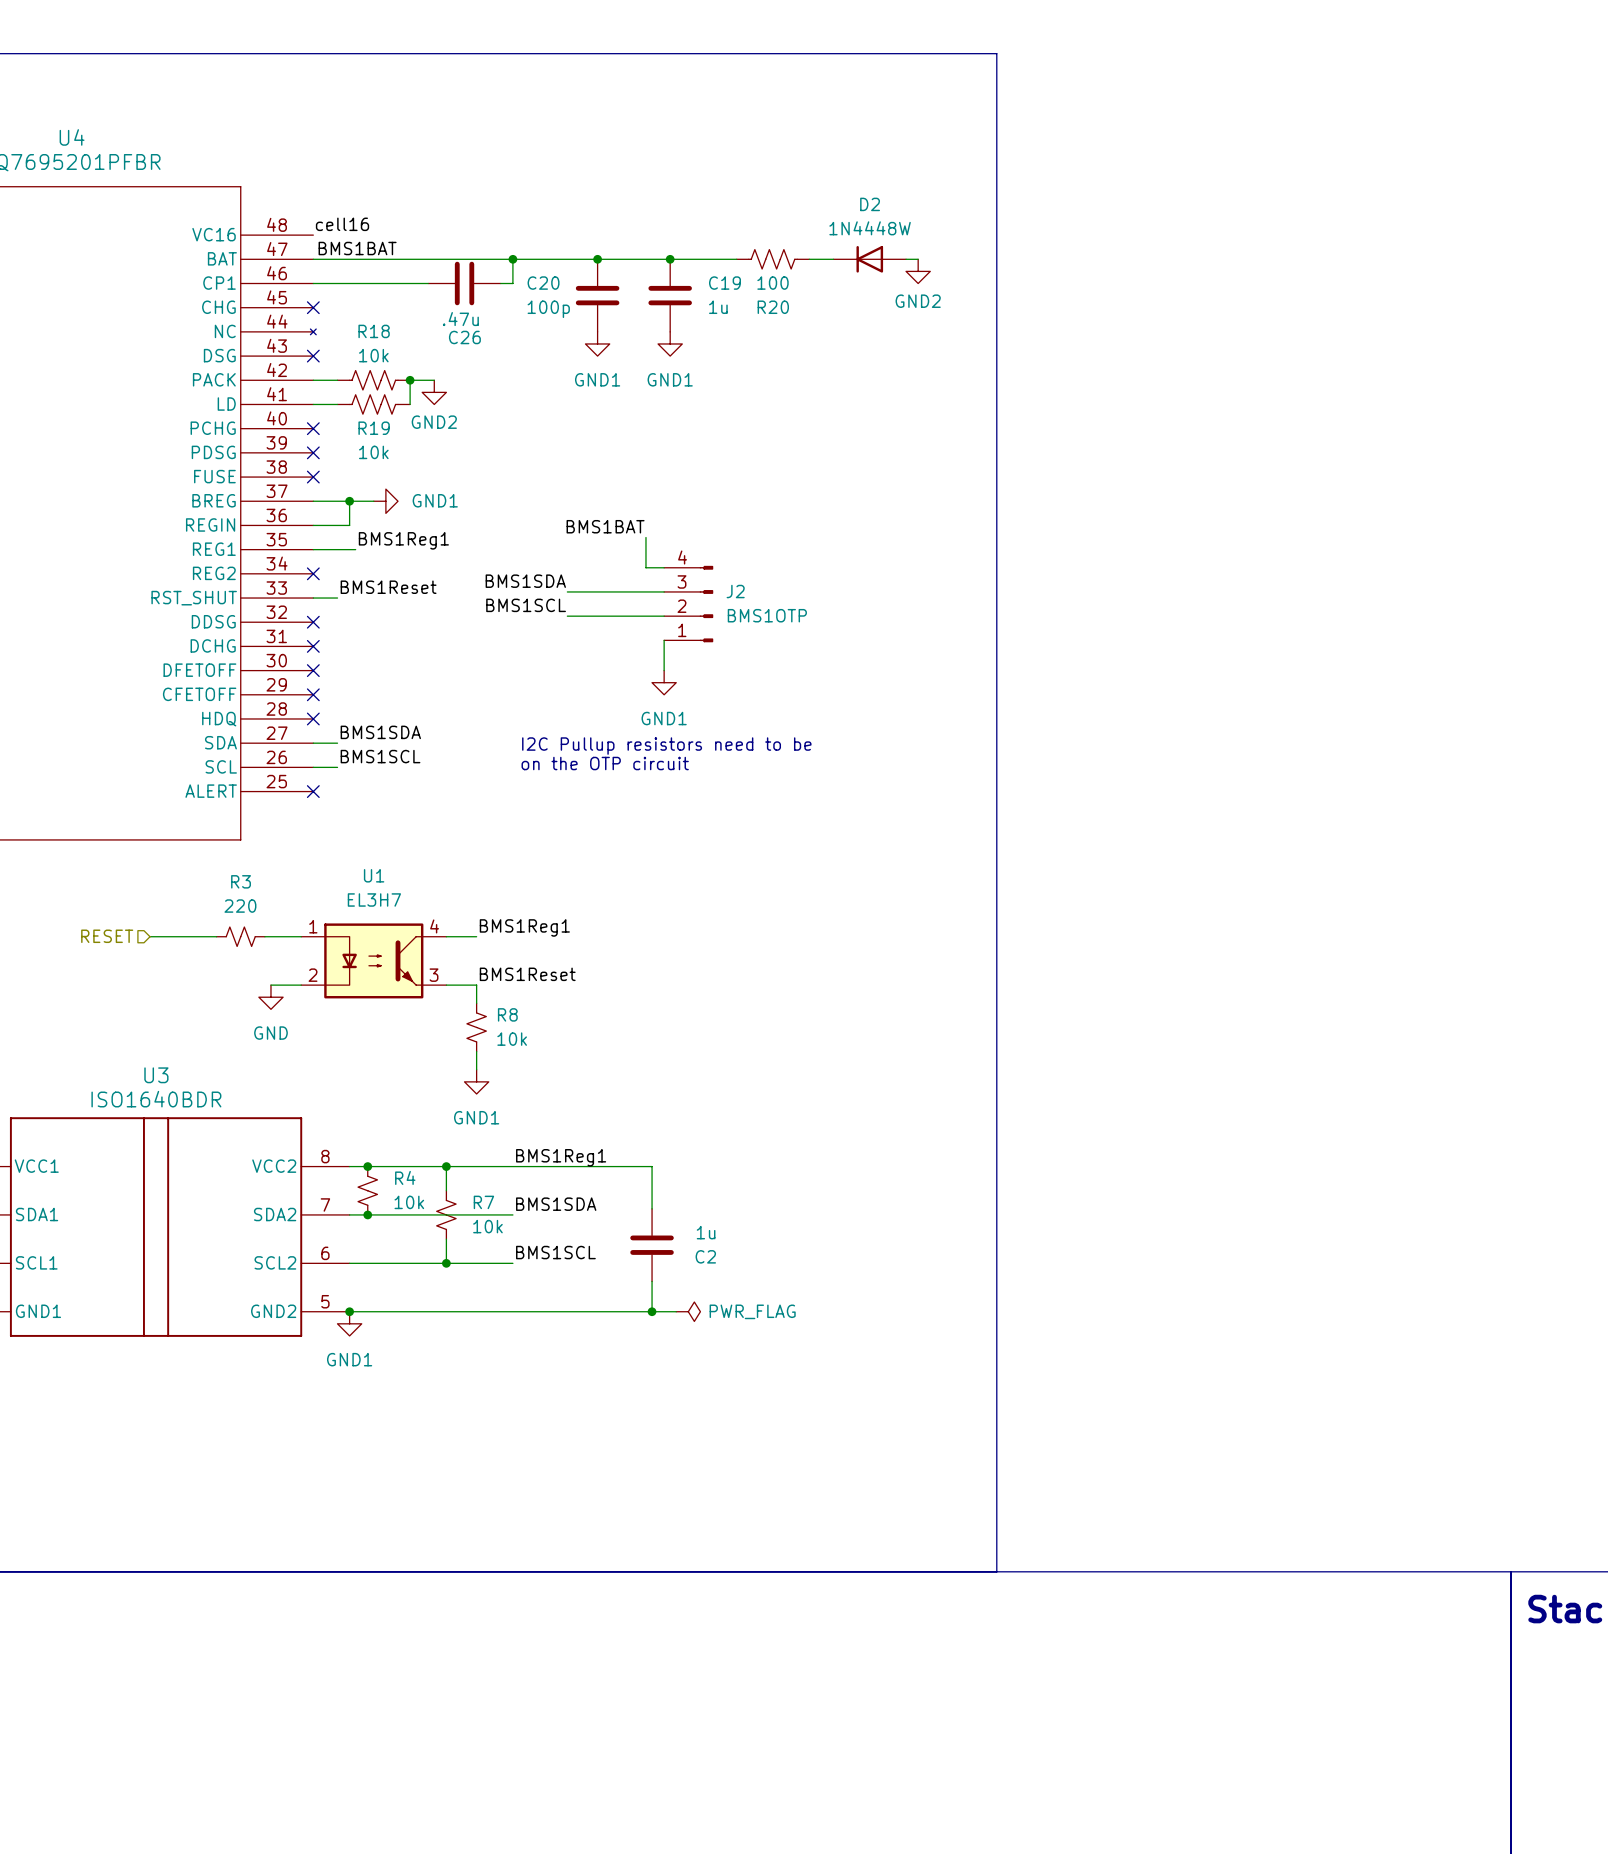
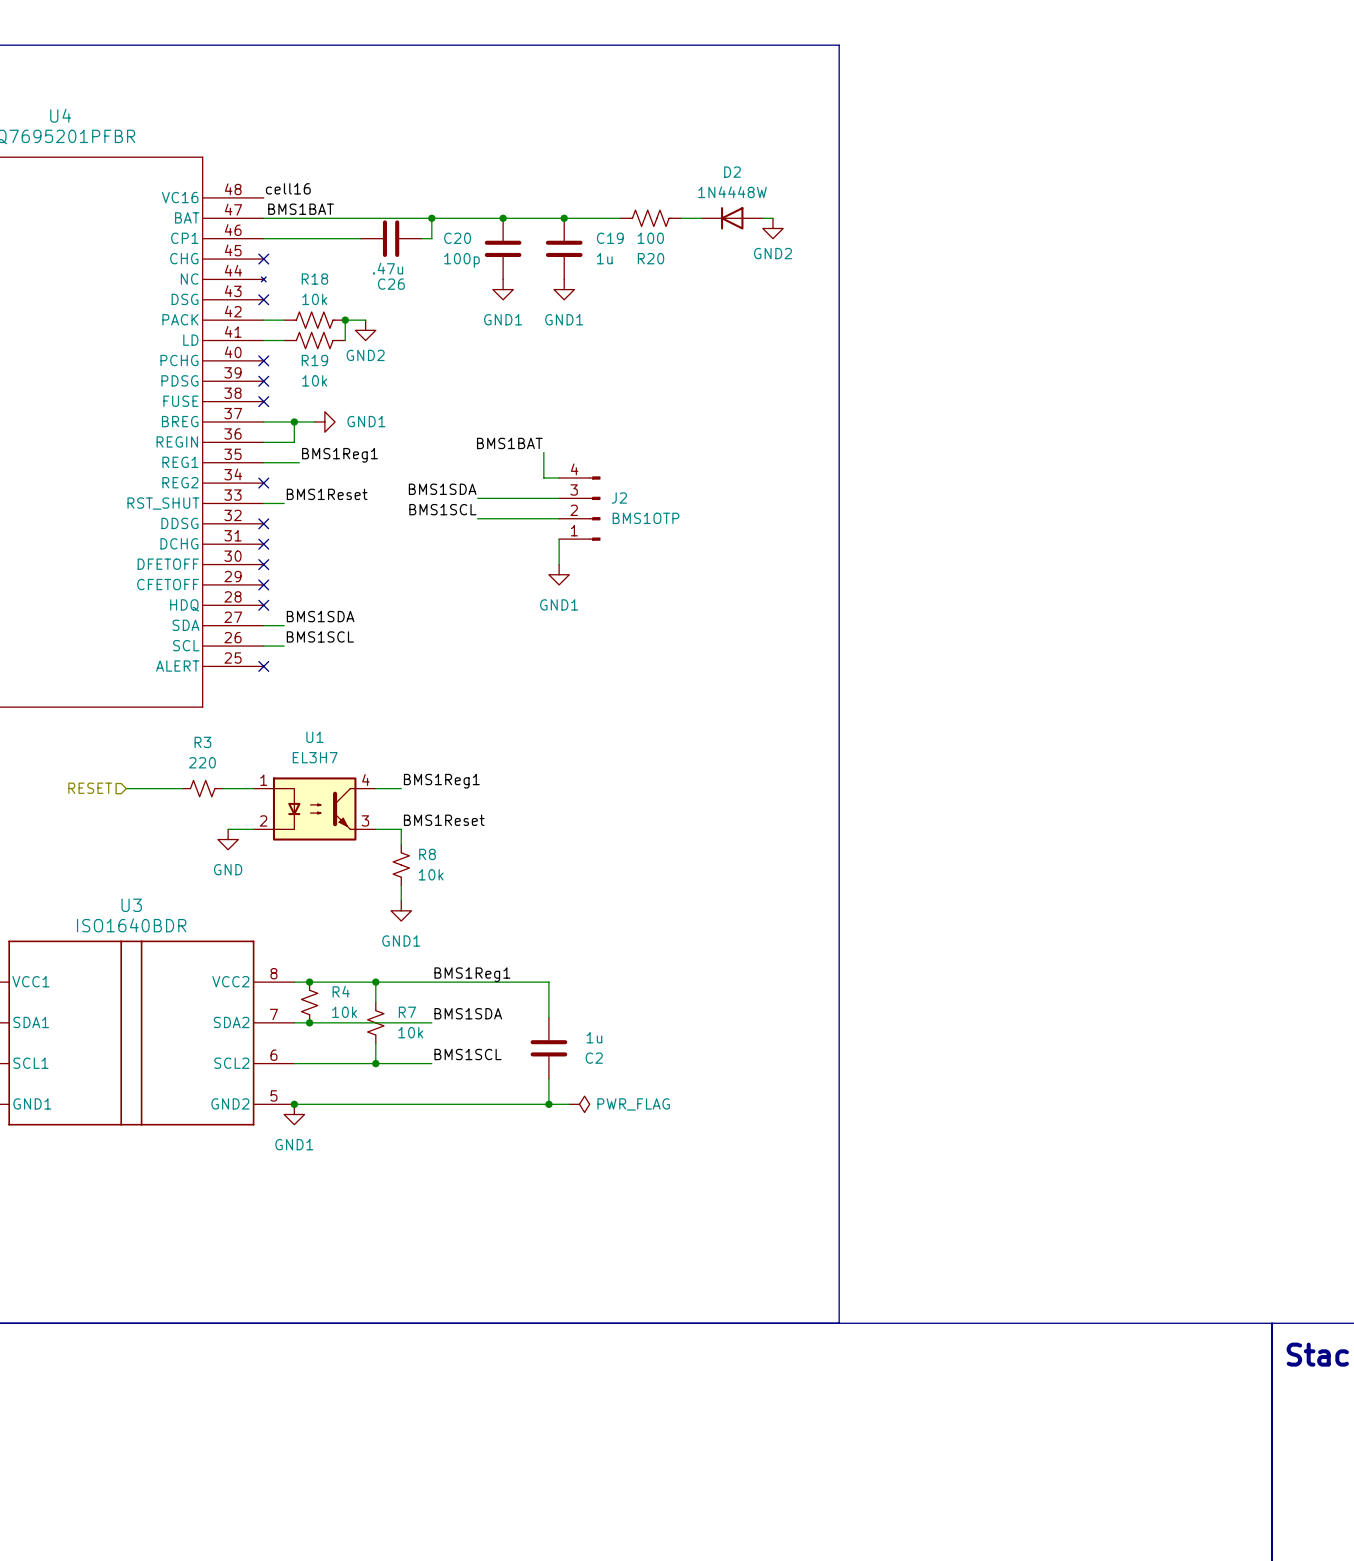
text: I2C Pullup resistors need to be (666, 746) -> none
text: on the OTP circuit (605, 763) -> none

